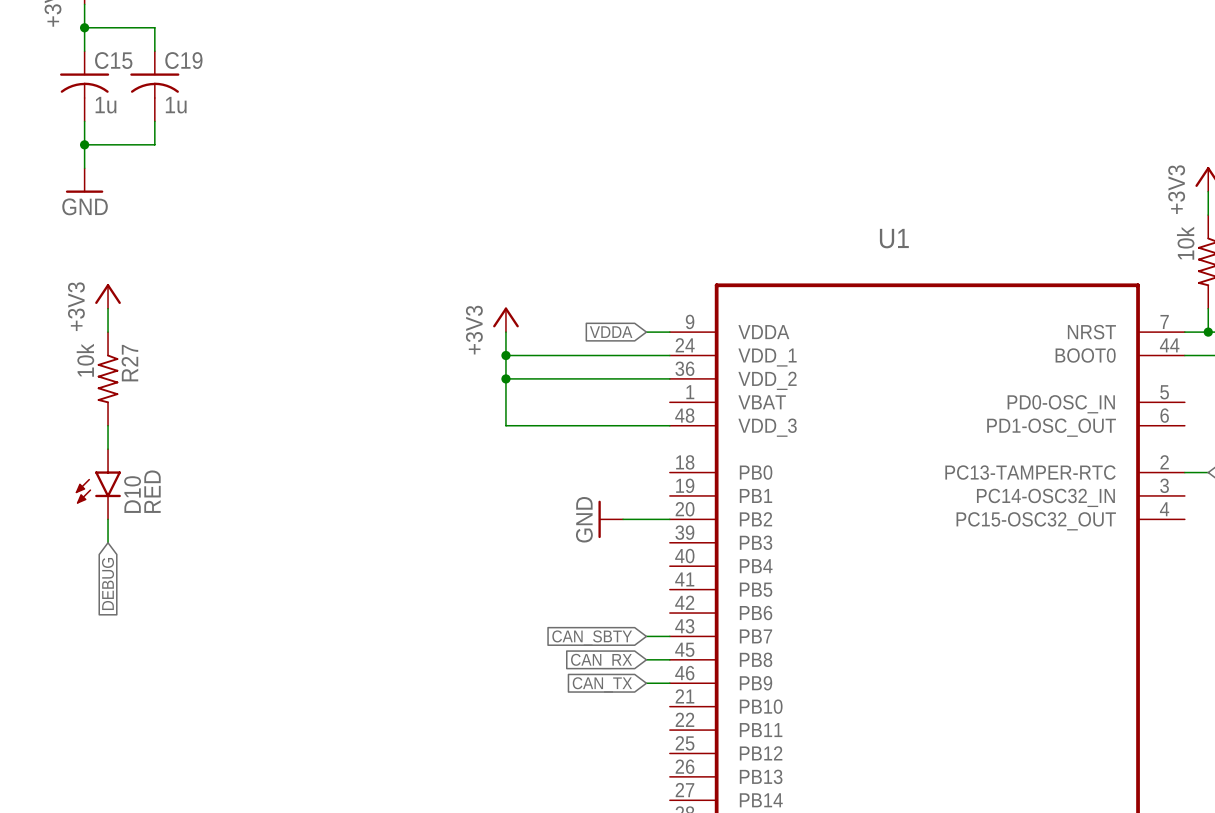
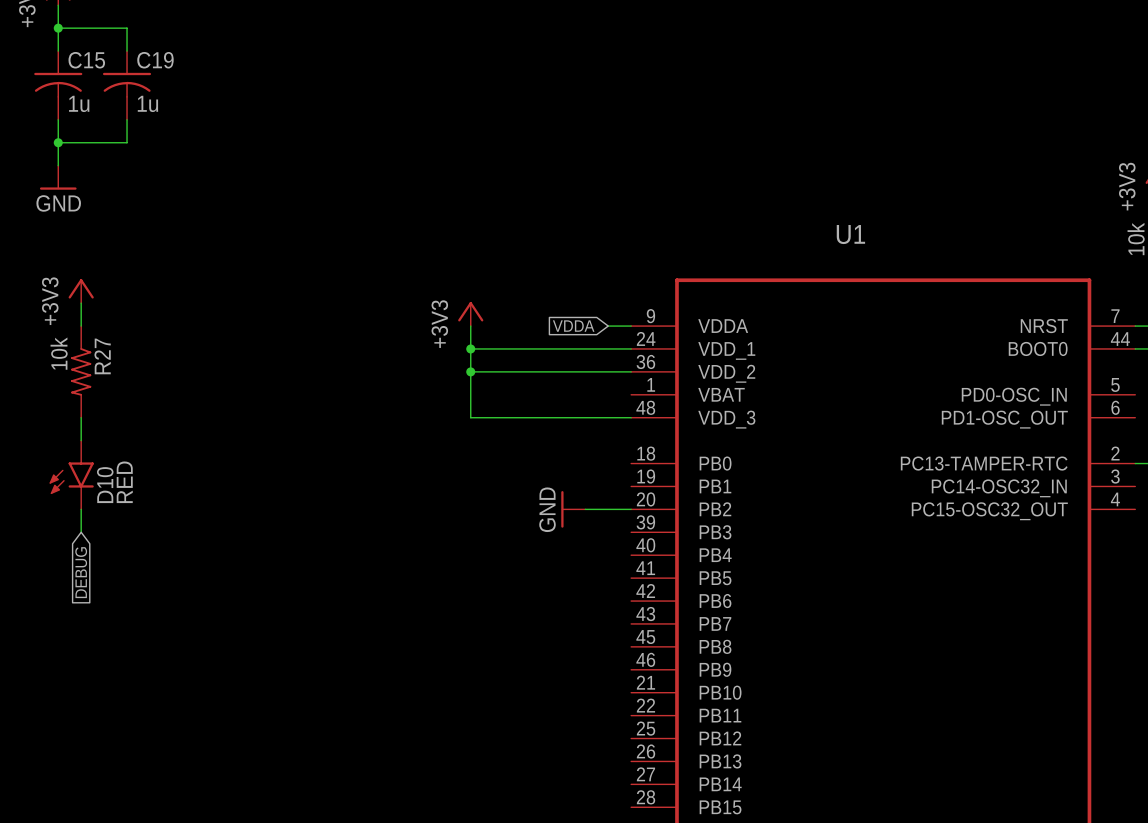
wire: (646, 636) (669, 636) -> none
global label: CAN_SBTY (592, 638) -> none
wire: (646, 659) (669, 659) -> none
global label: CAN_RX (601, 661) -> none
wire: (646, 683) (669, 683) -> none
global label: CAN_TX (602, 684) -> none

